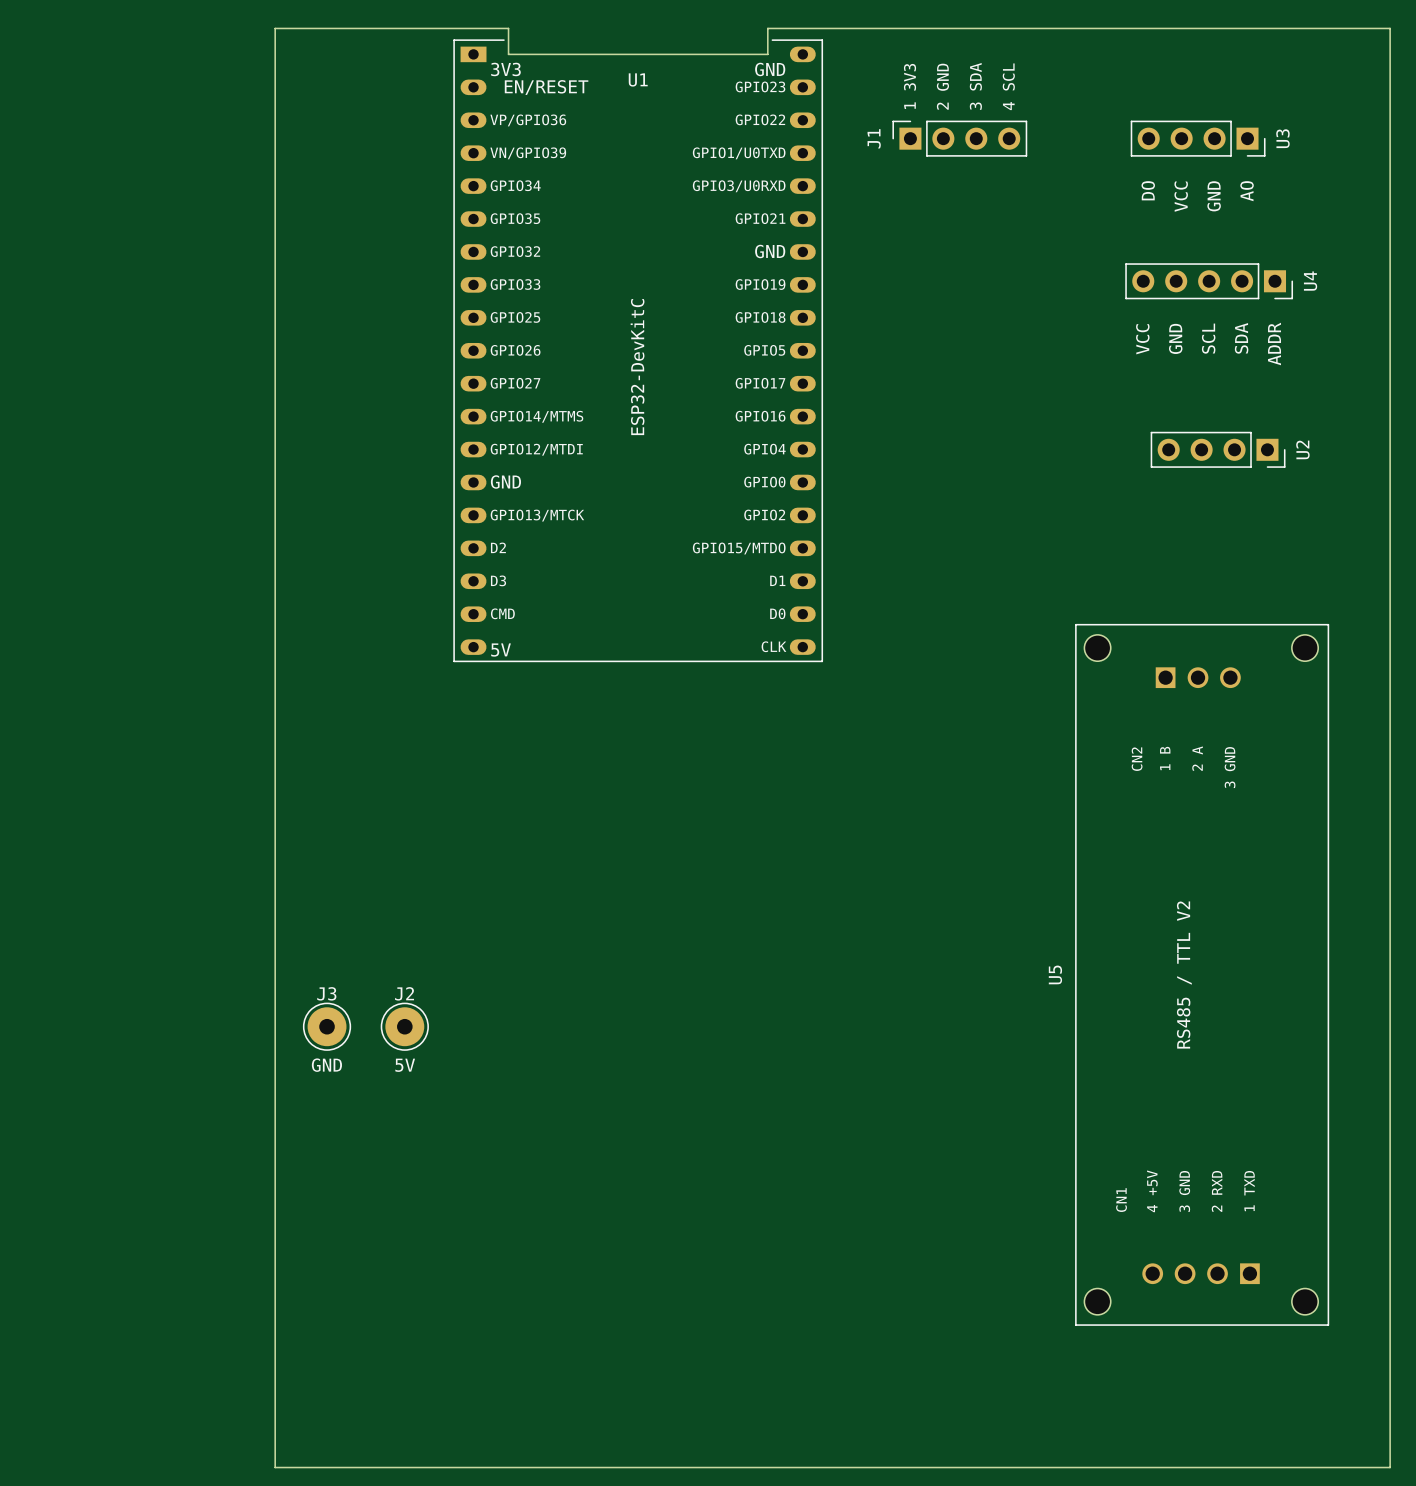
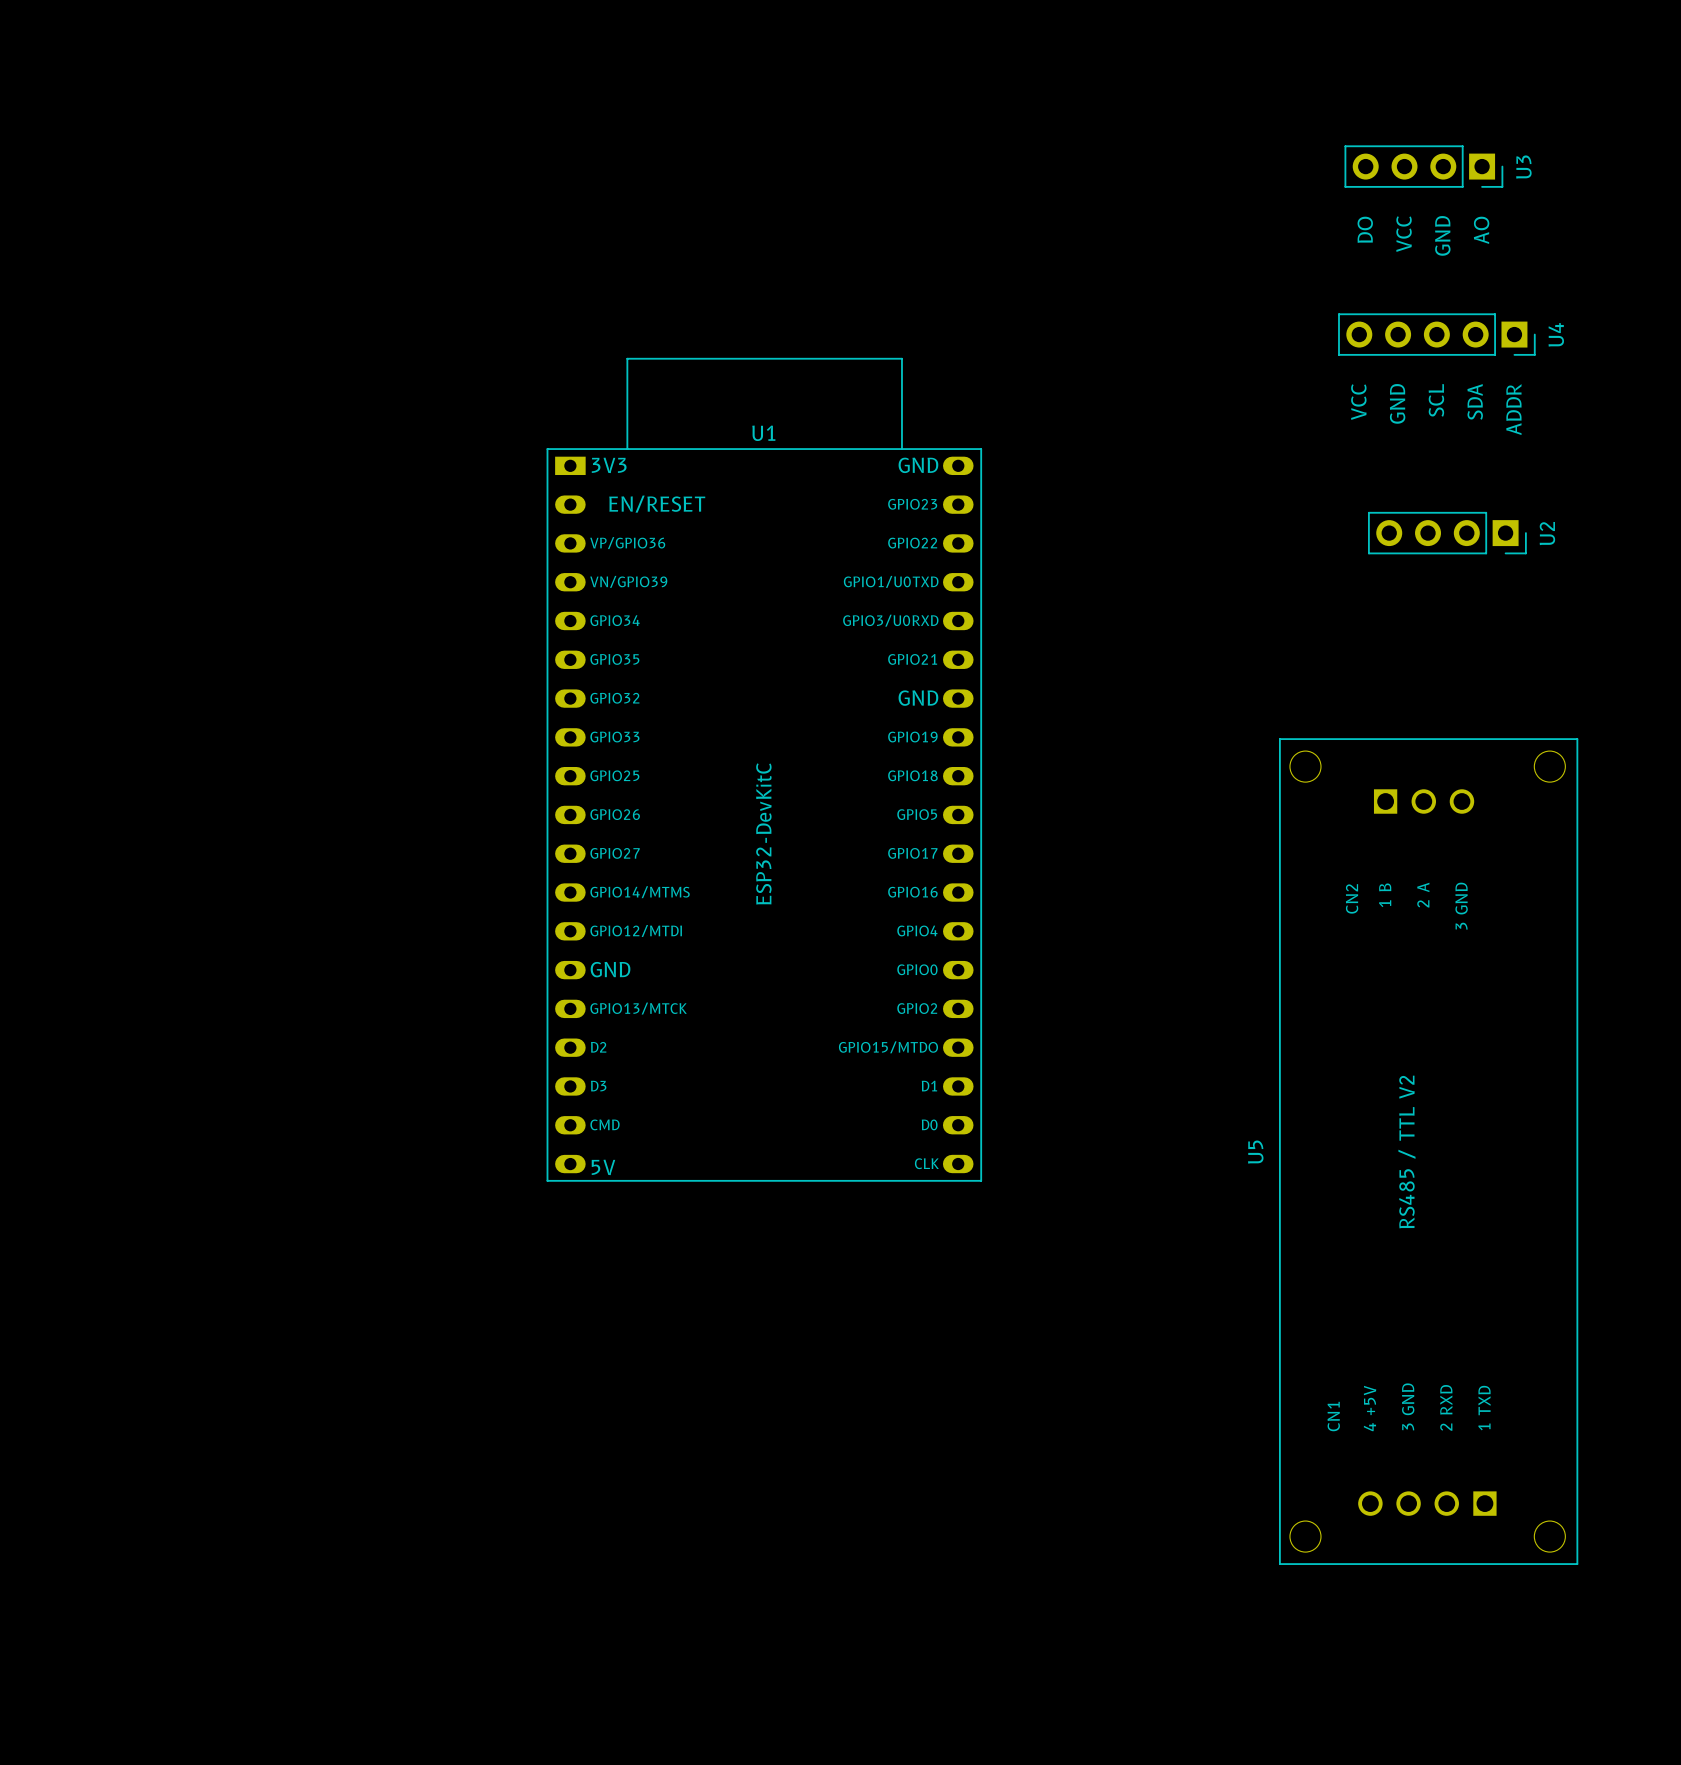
board edge: (275, 28) (508, 28) (508, 54) (767, 54) (767, 28) (1390, 28) (1390, 1467) (275, 1467) (275, 28) -> none
U1 footprint: [453, 39, 824, 663] -> [546, 357, 983, 1182]
J1: (959, 138) -> none
U1 value position: ESP32-DevKitC (637, 367) -> ESP32-DevKitC (763, 833)
J3: (327, 1026) -> none
J2: (404, 1026) -> none
text: GND (326, 1065) -> none
text: 5V (405, 1065) -> none

